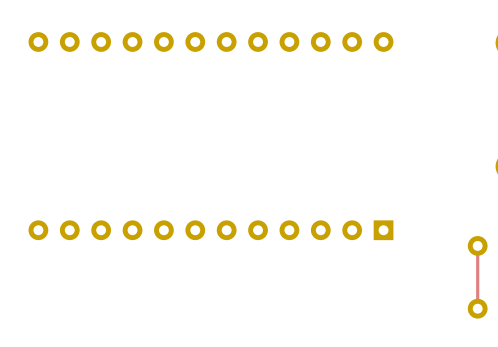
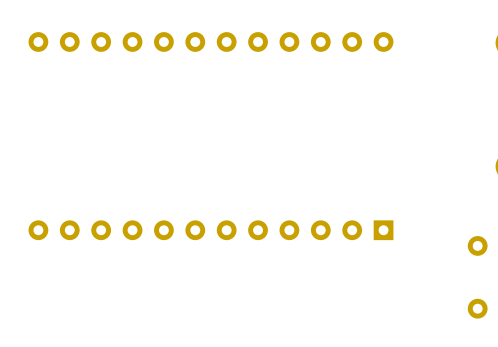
top track: (477, 245) (477, 308) -> none

